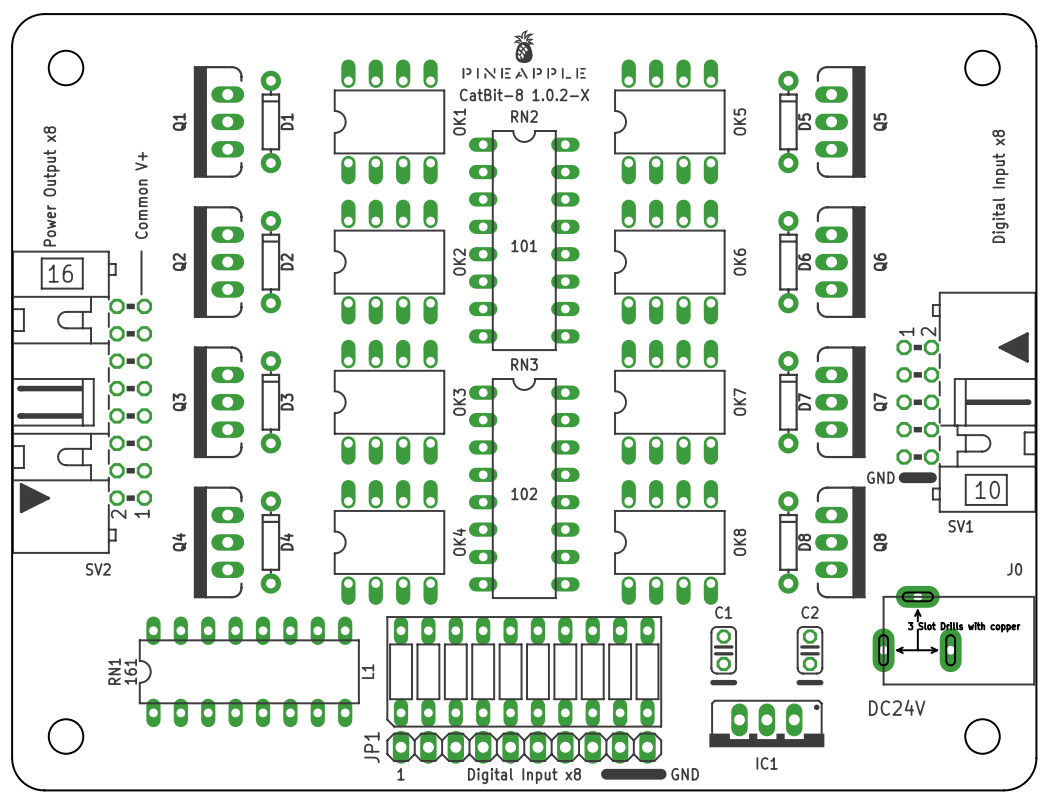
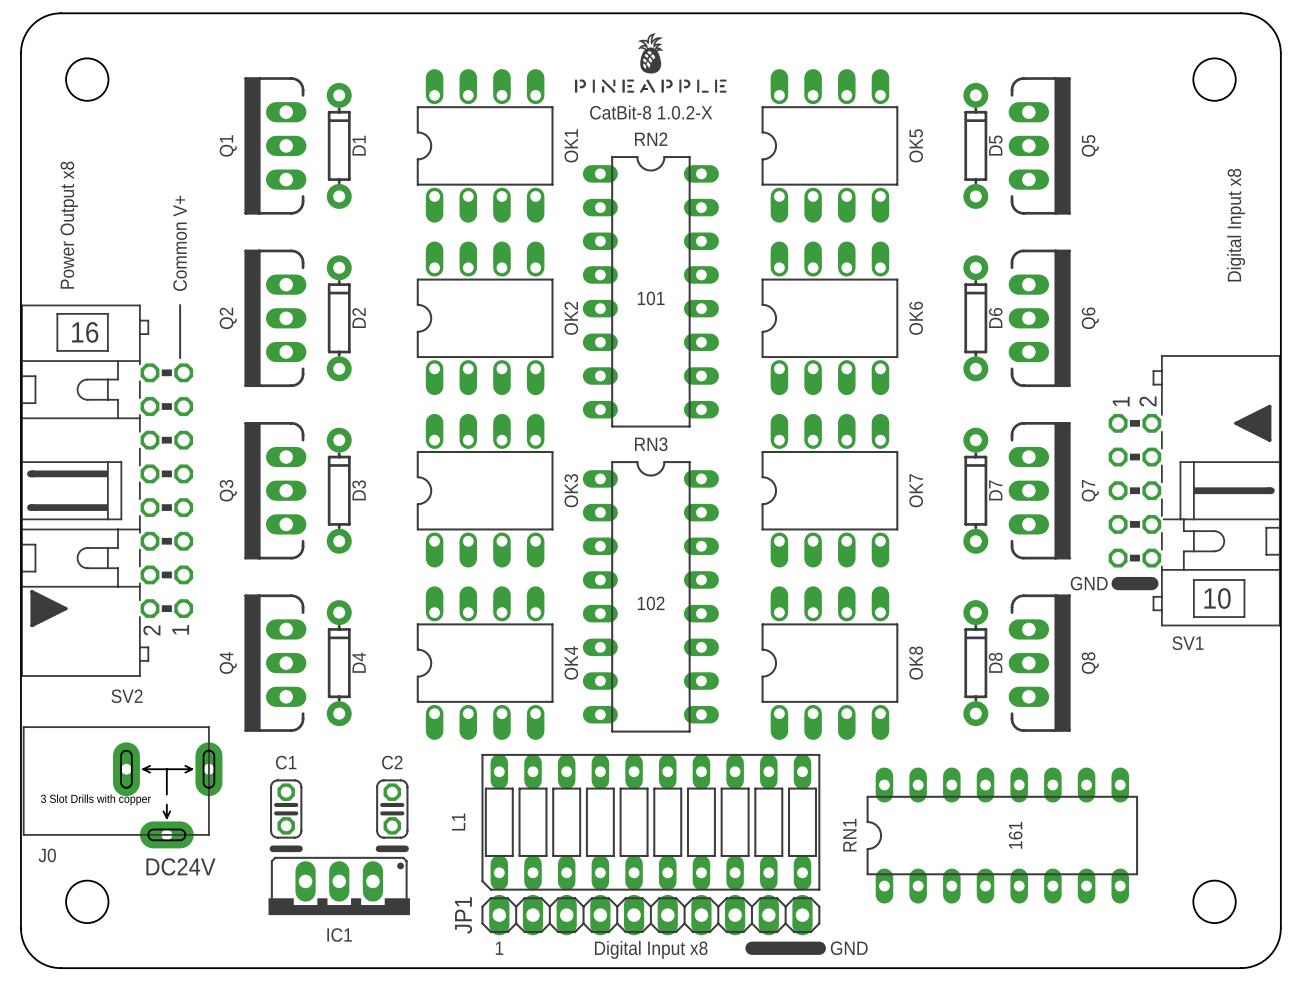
J0 name position: J0 (1014, 569) -> J0 (47, 855)
J0 footprint: [872, 585, 1035, 686] -> [22, 726, 223, 849]
C1 position: (723, 650) -> (286, 809)
C2 position: (810, 650) -> (392, 809)
RN1 name position: RN1 (114, 671) -> RN1 (849, 835)
text: 161 (130, 671) -> none
RN1 position: (249, 671) -> (1002, 835)
line: (712, 682) (734, 682) -> none
line: (799, 682) (820, 682) -> none
text: none -> 161 (1015, 835)
line: none -> (272, 848) (299, 848)
line: none -> (379, 848) (405, 848)
text: none -> DC24V (180, 866)
text: DC24V (897, 707) -> none
IC1 position: (766, 723) -> (339, 885)

